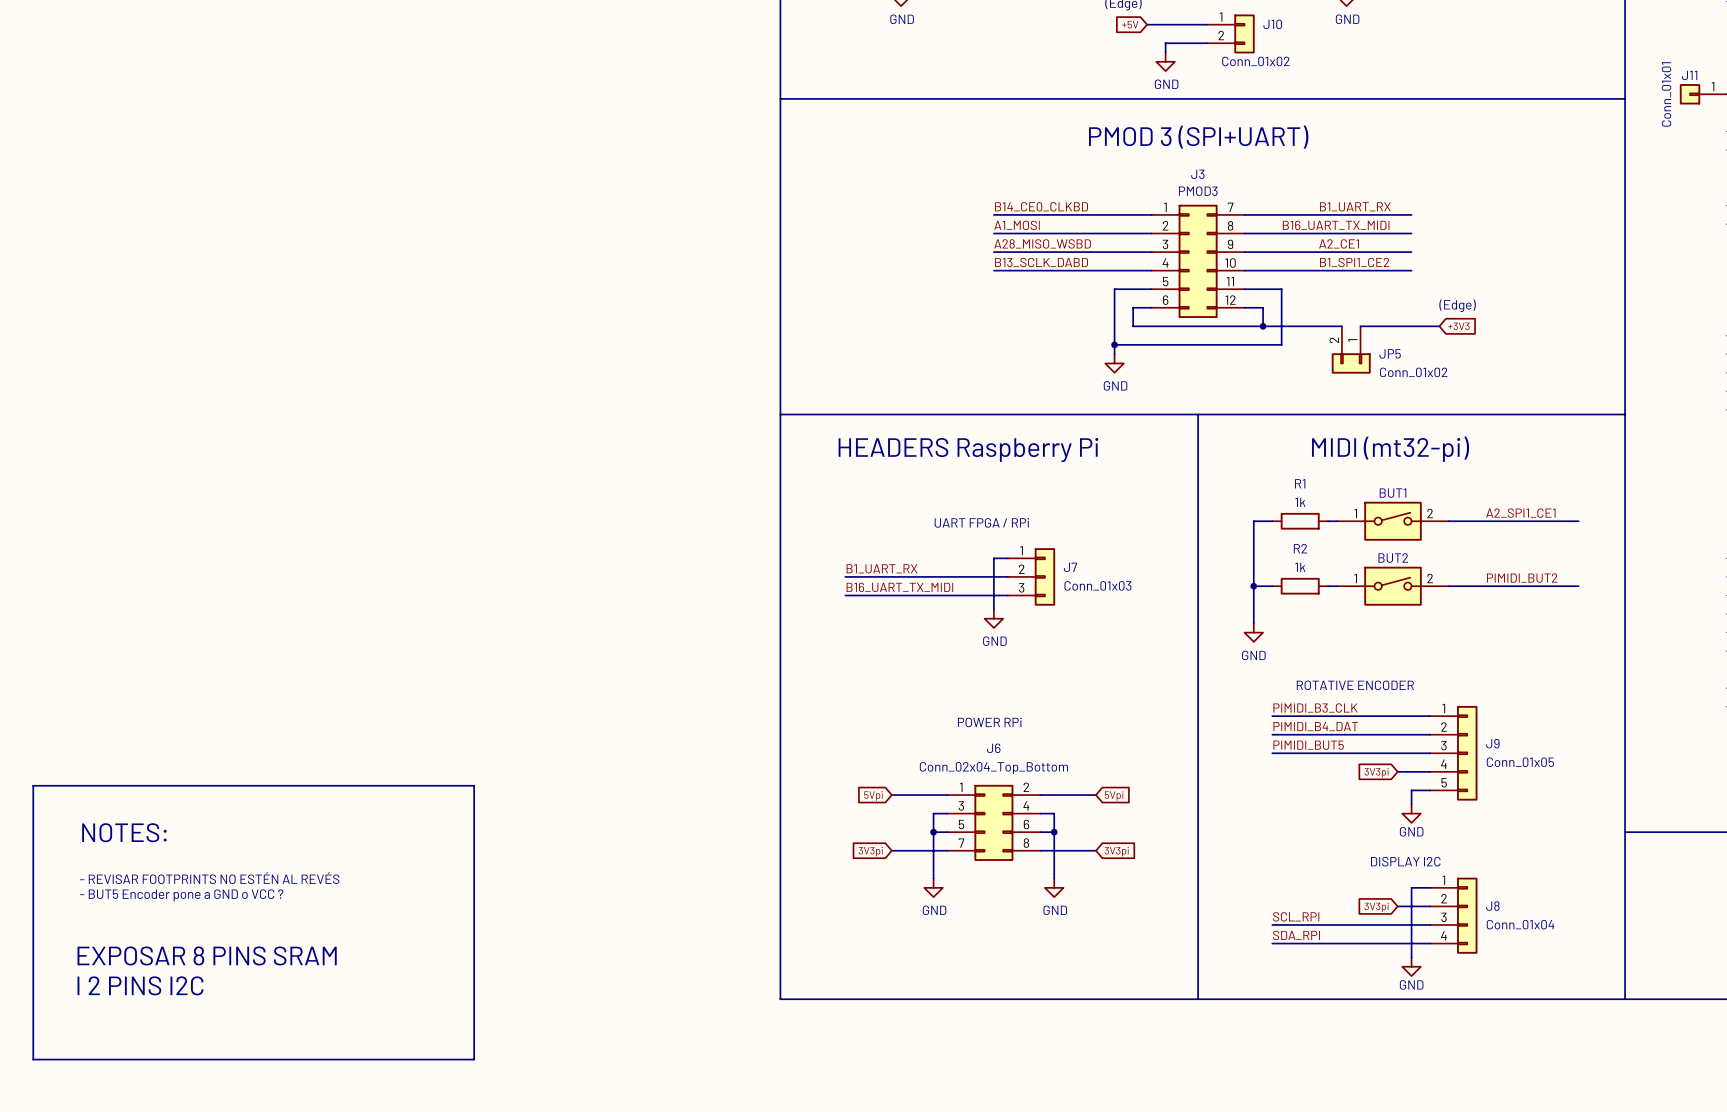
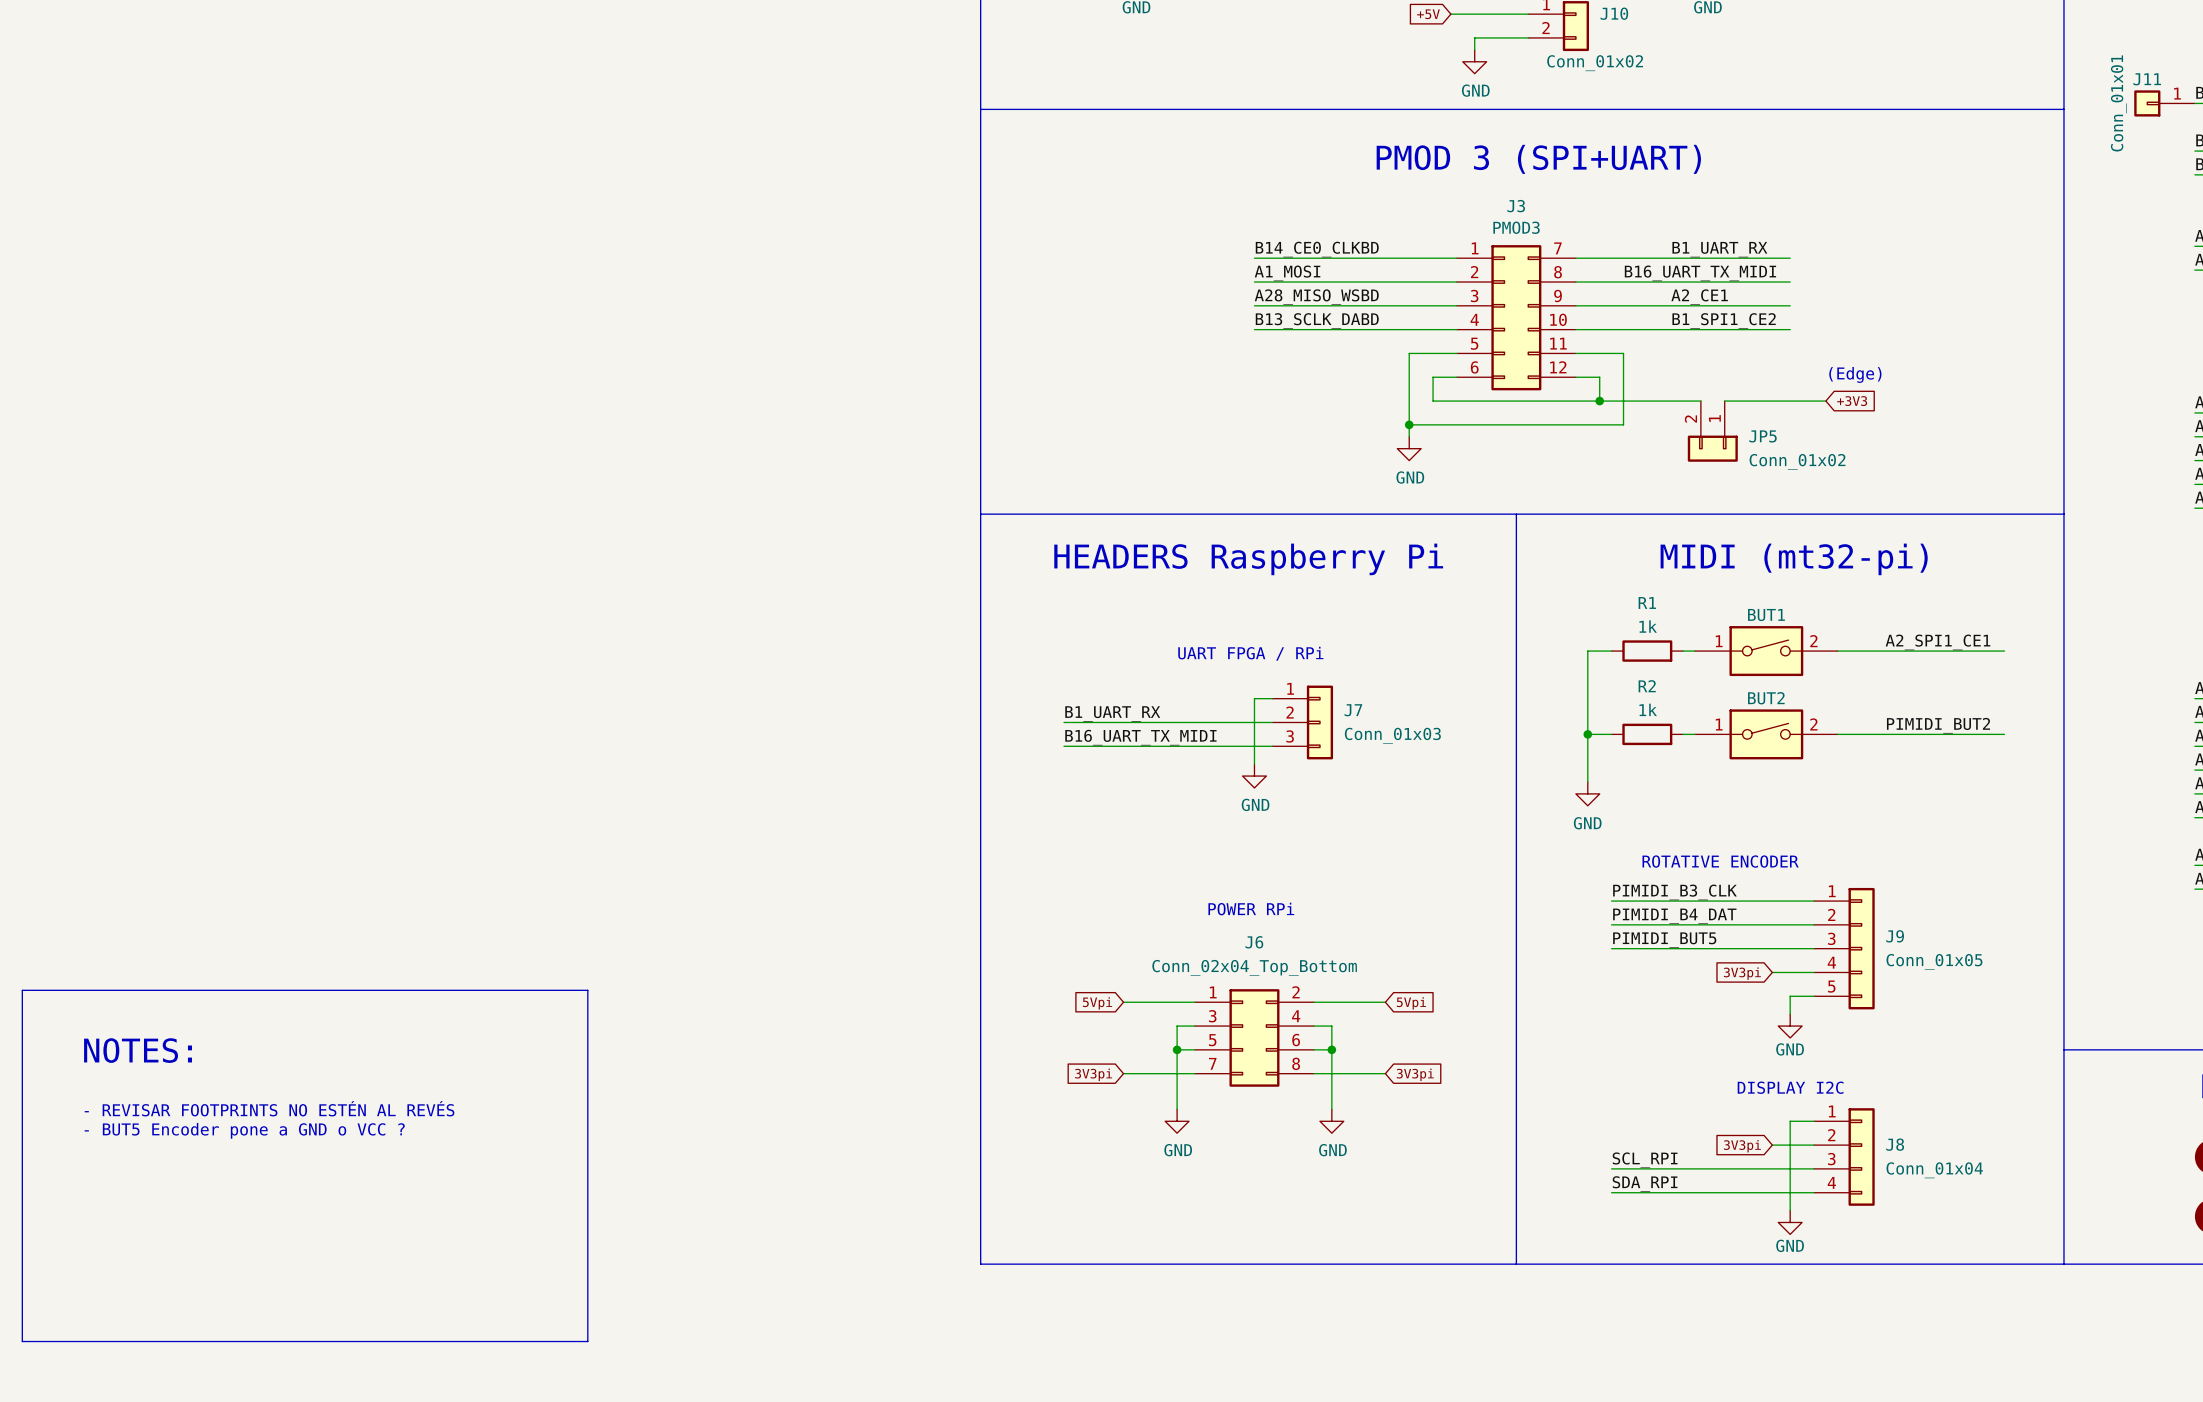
text: EXPOSAR 8 PINS SRAM (207, 955) -> none
text: I 2 PINS I2C (140, 985) -> none

